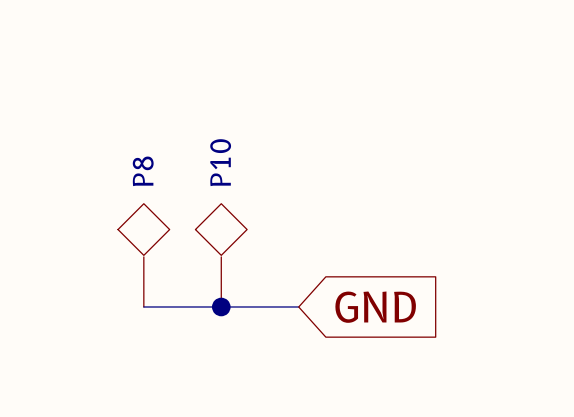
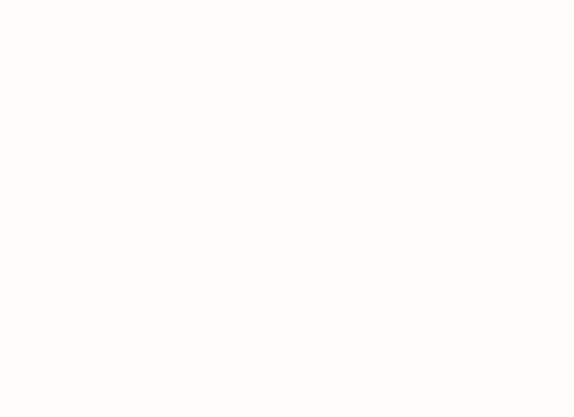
P8: (143, 255) -> none
P10: (221, 255) -> none
wire: (143, 306) (298, 306) -> none
junction: (221, 306) -> none
global label: GND (375, 307) -> none

